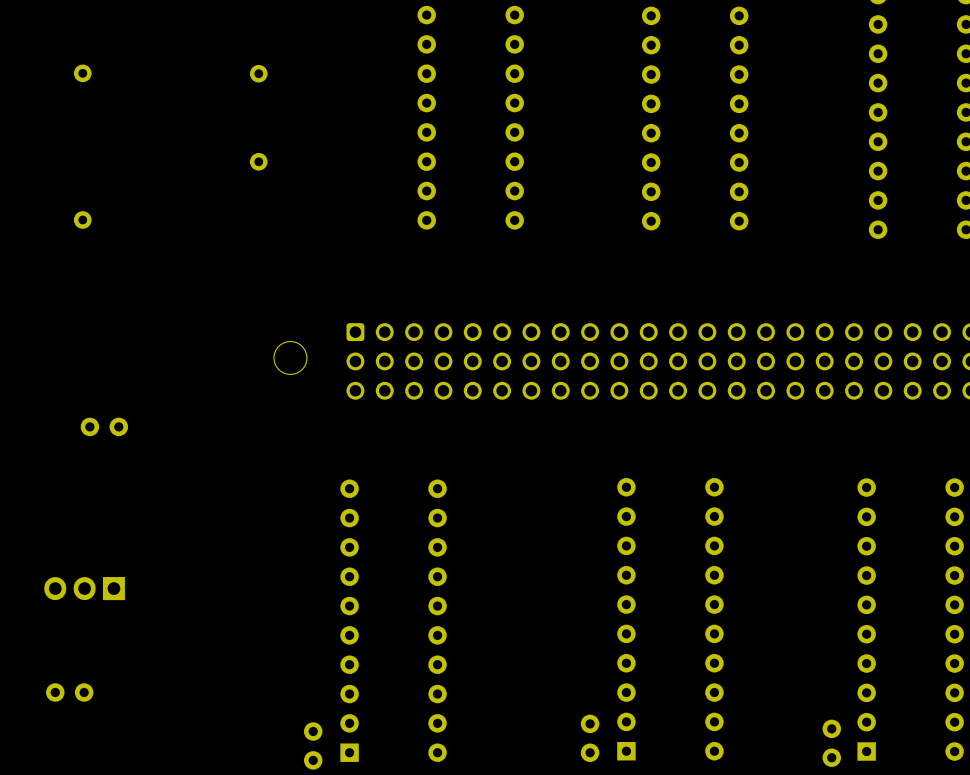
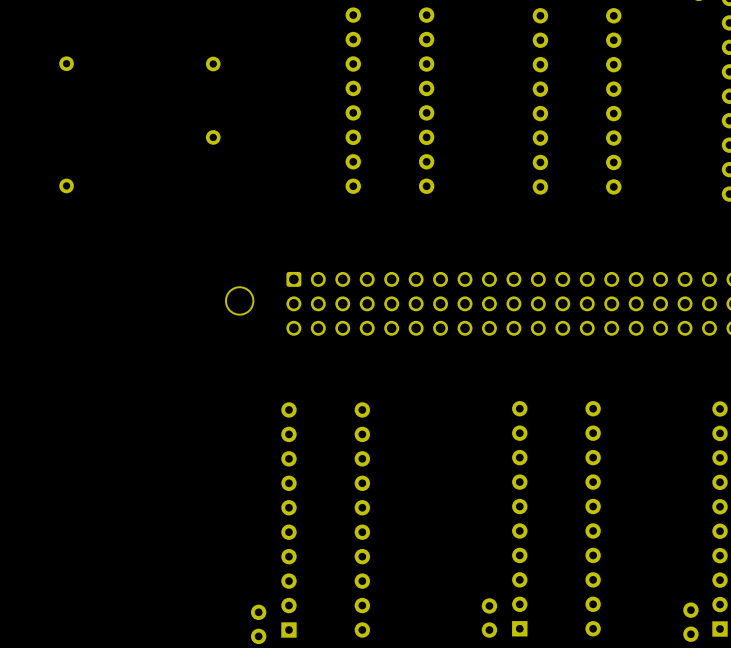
part: (104, 426) -> none
part: (84, 588) -> none
part: (69, 692) -> none

